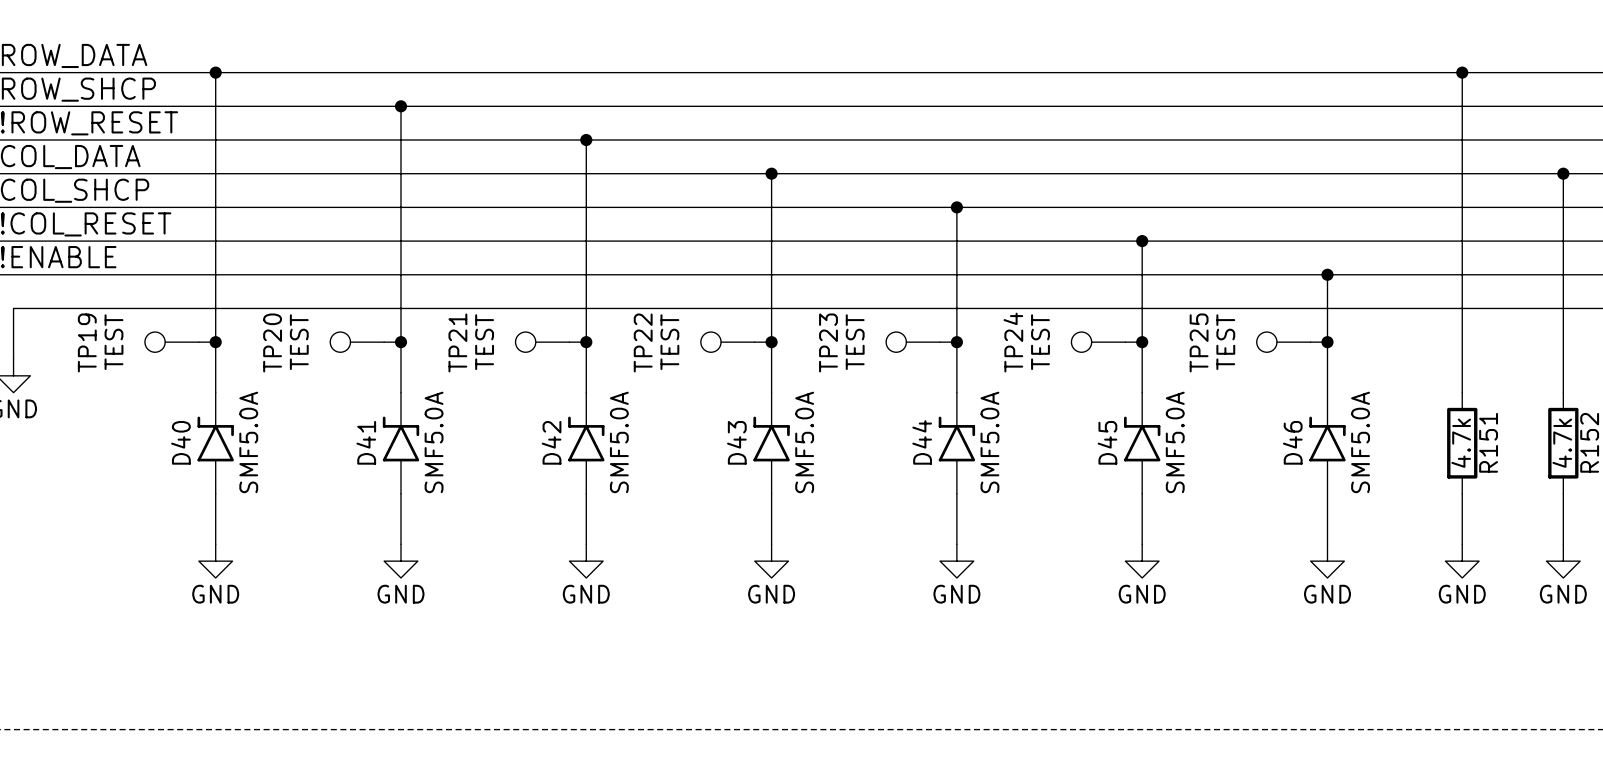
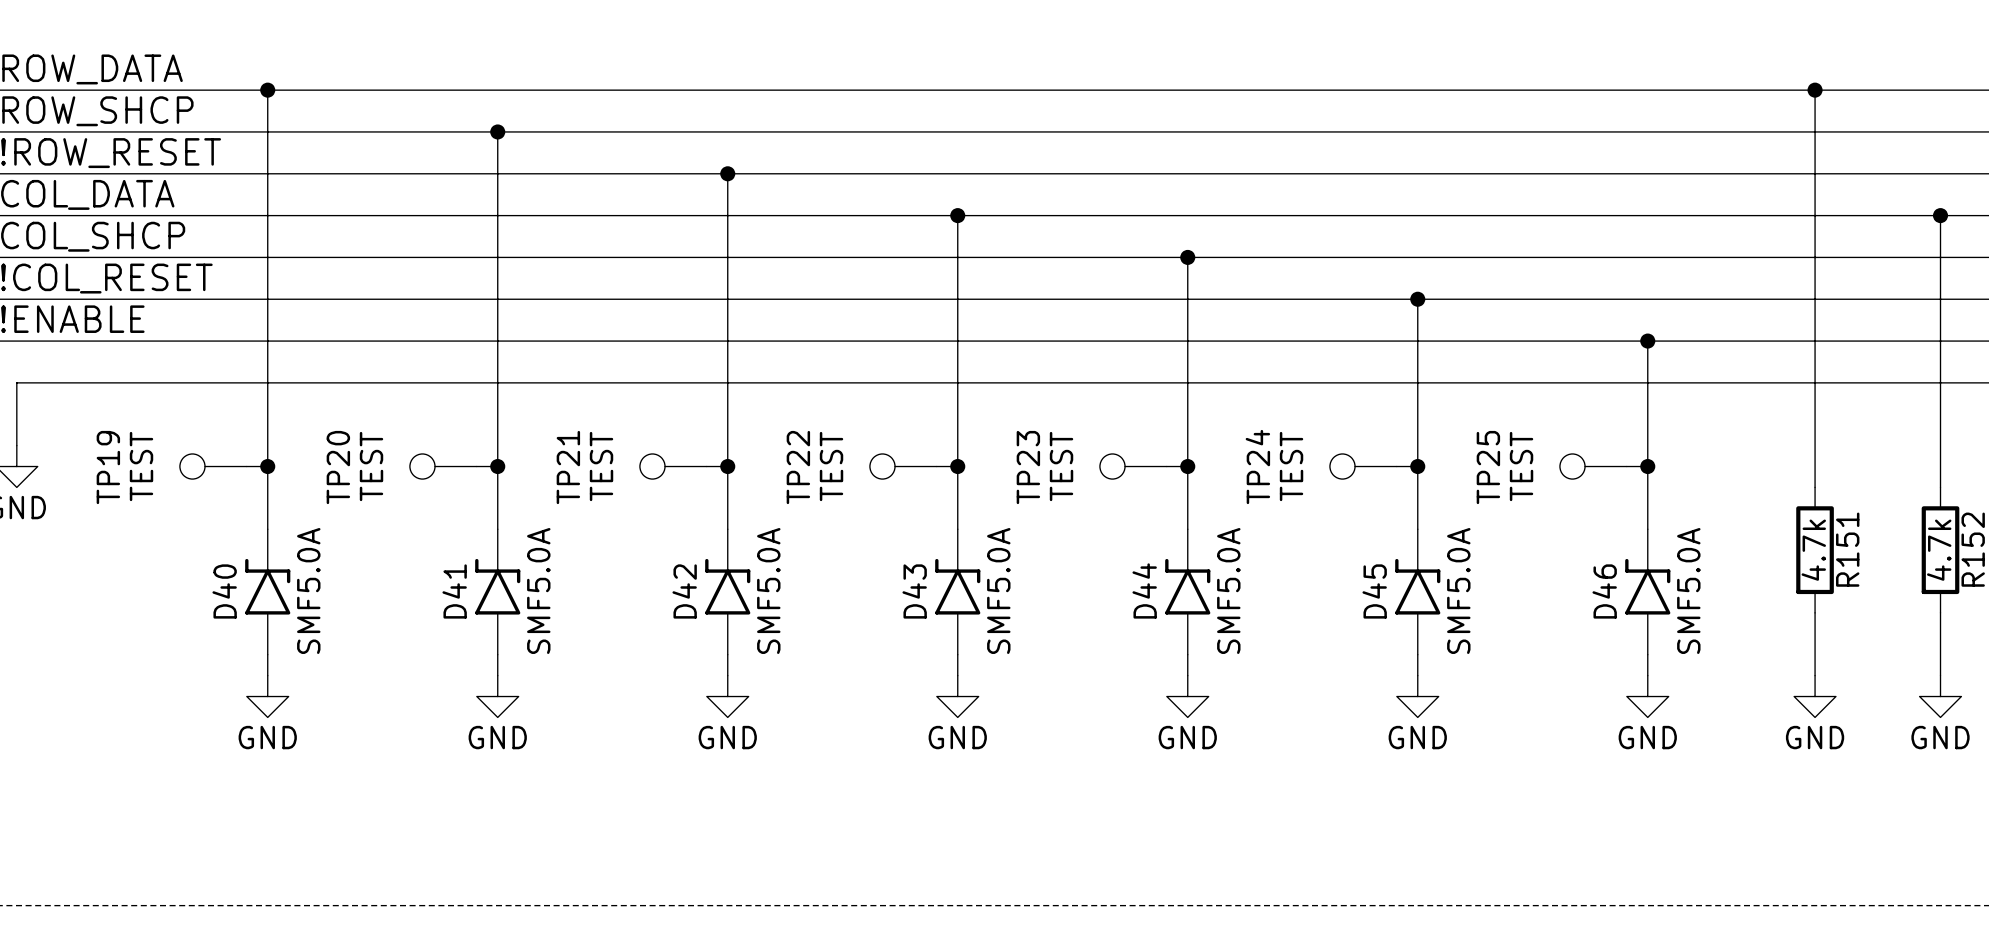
TP19 position: (171, 342) -> (213, 466)
wire: (198, 342) (215, 342) -> (246, 466) (267, 466)
junction position: (215, 342) -> (267, 466)
TP20 position: (357, 342) -> (443, 466)
wire: (384, 342) (401, 342) -> (476, 466) (497, 466)
junction position: (401, 342) -> (497, 466)
TP21 position: (542, 342) -> (673, 466)
wire: (569, 342) (586, 342) -> (706, 466) (727, 466)
junction position: (586, 342) -> (727, 466)
TP22 position: (727, 342) -> (903, 466)
wire: (754, 342) (771, 342) -> (936, 466) (957, 466)
junction position: (771, 342) -> (957, 466)
TP23 position: (913, 342) -> (1133, 466)
wire: (940, 342) (956, 342) -> (1166, 466) (1187, 466)
junction position: (956, 342) -> (1187, 466)
TP24 position: (1098, 342) -> (1363, 466)
wire: (1125, 342) (1142, 342) -> (1396, 466) (1417, 466)
junction position: (1142, 342) -> (1417, 466)
TP25 position: (1283, 342) -> (1593, 466)
wire: (1310, 342) (1327, 342) -> (1626, 466) (1647, 466)
junction position: (1327, 342) -> (1647, 466)
D40 position: (215, 443) -> (267, 591)
D41 position: (401, 443) -> (497, 591)
D42 position: (586, 443) -> (727, 591)
D43 position: (771, 443) -> (957, 591)
D44 position: (956, 443) -> (1187, 591)
D45 position: (1142, 443) -> (1417, 591)
D46 position: (1327, 443) -> (1647, 591)

